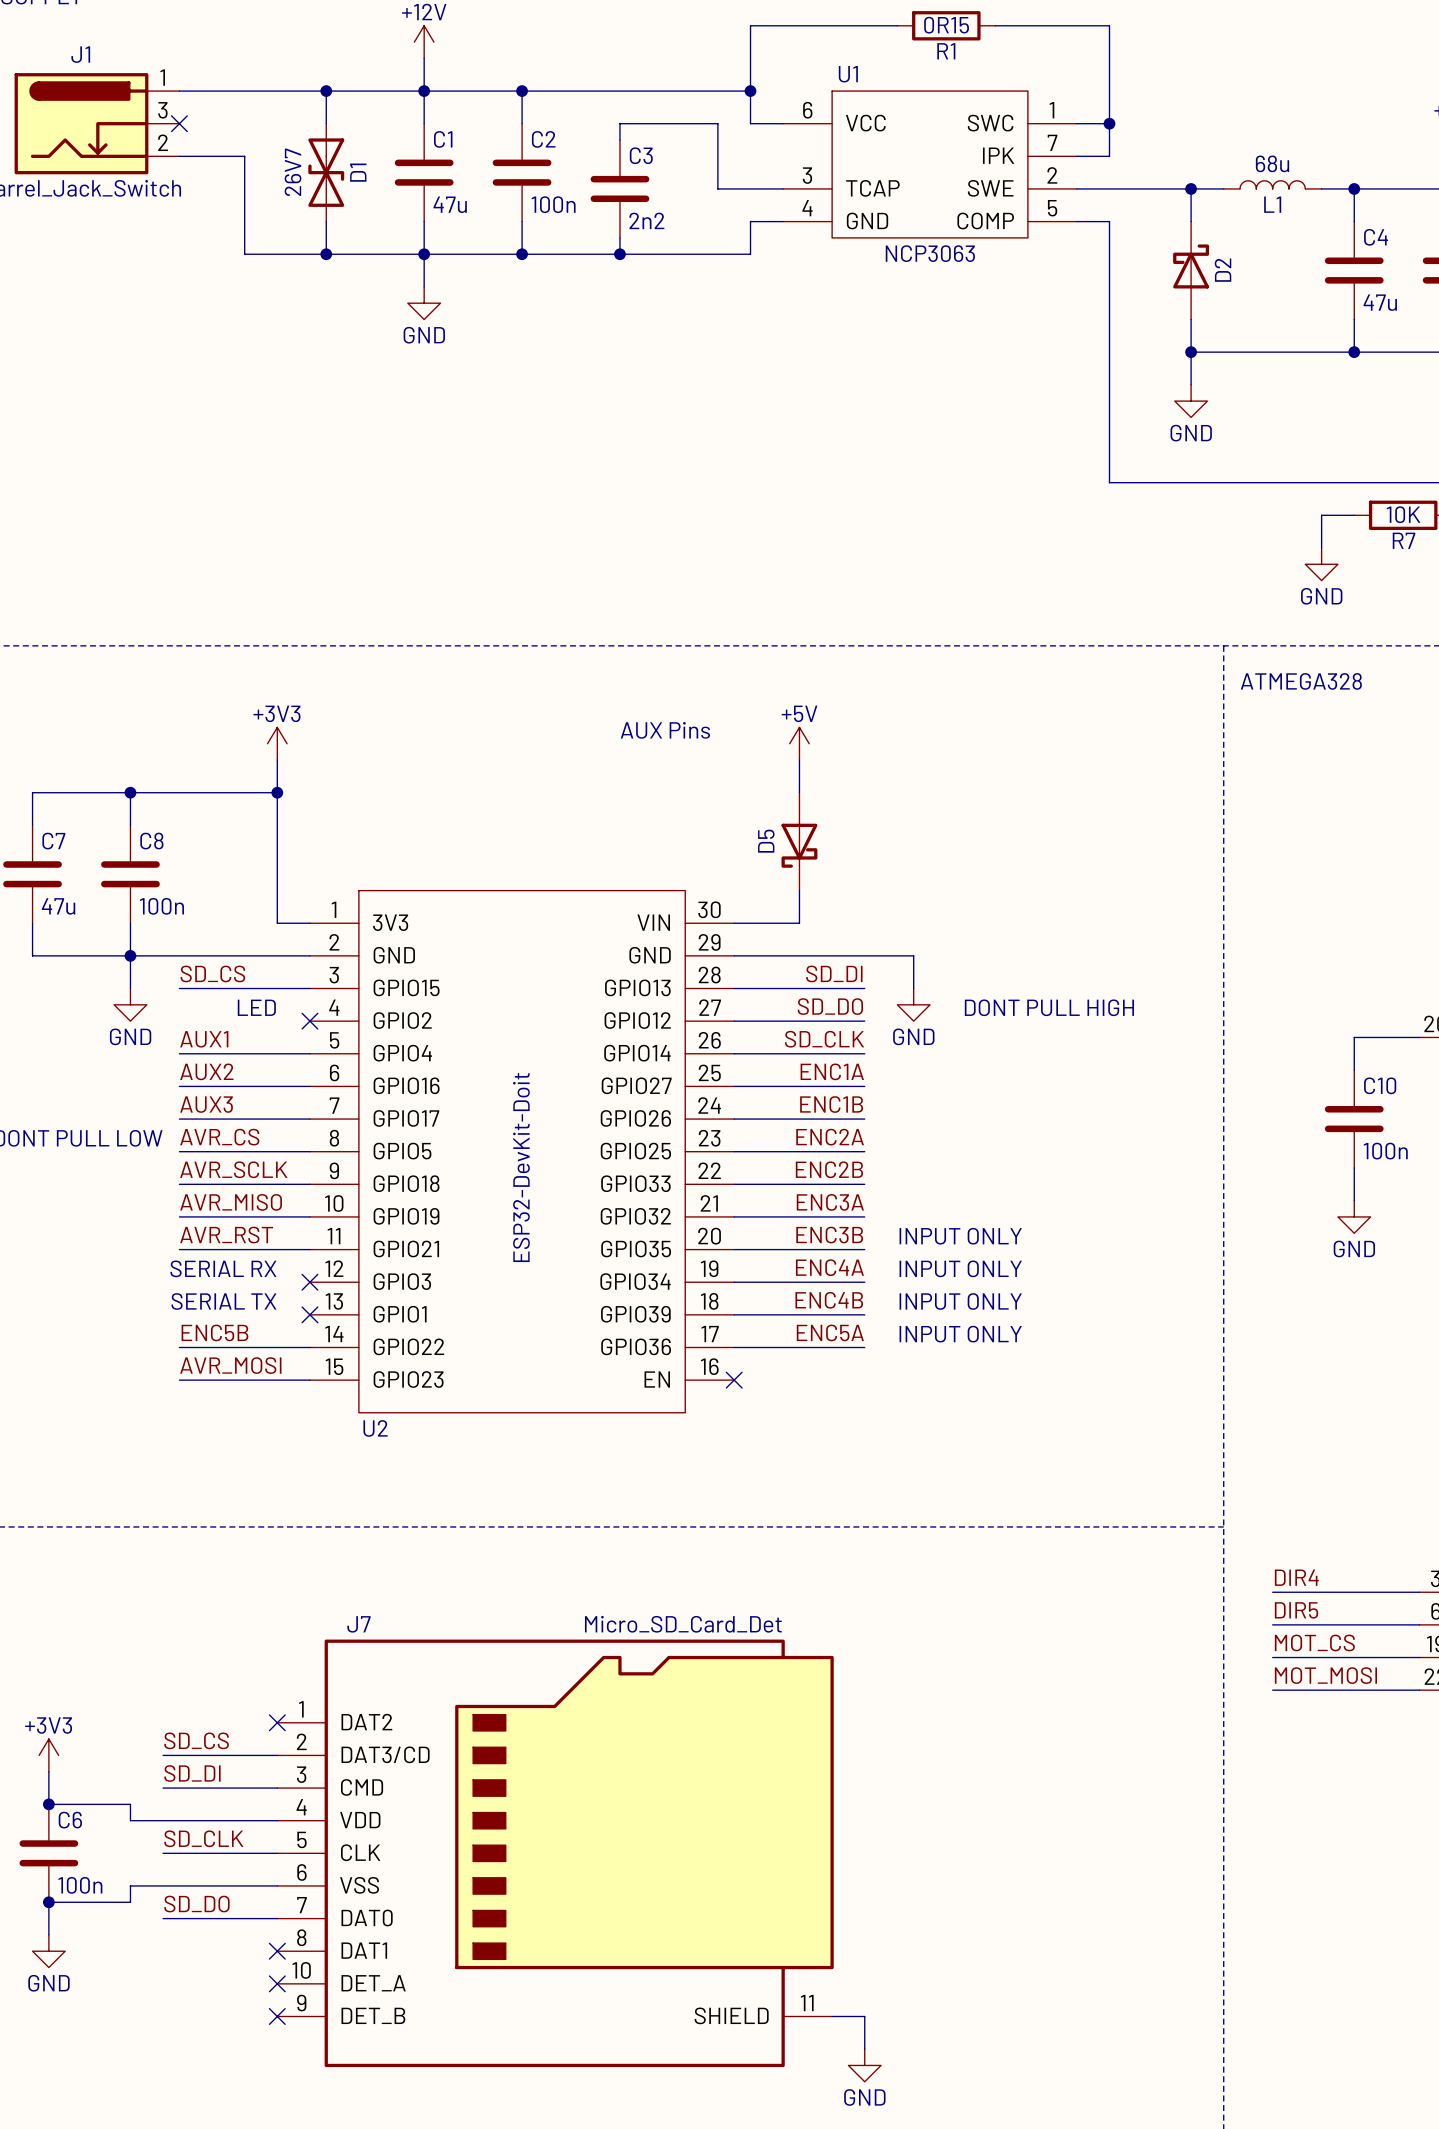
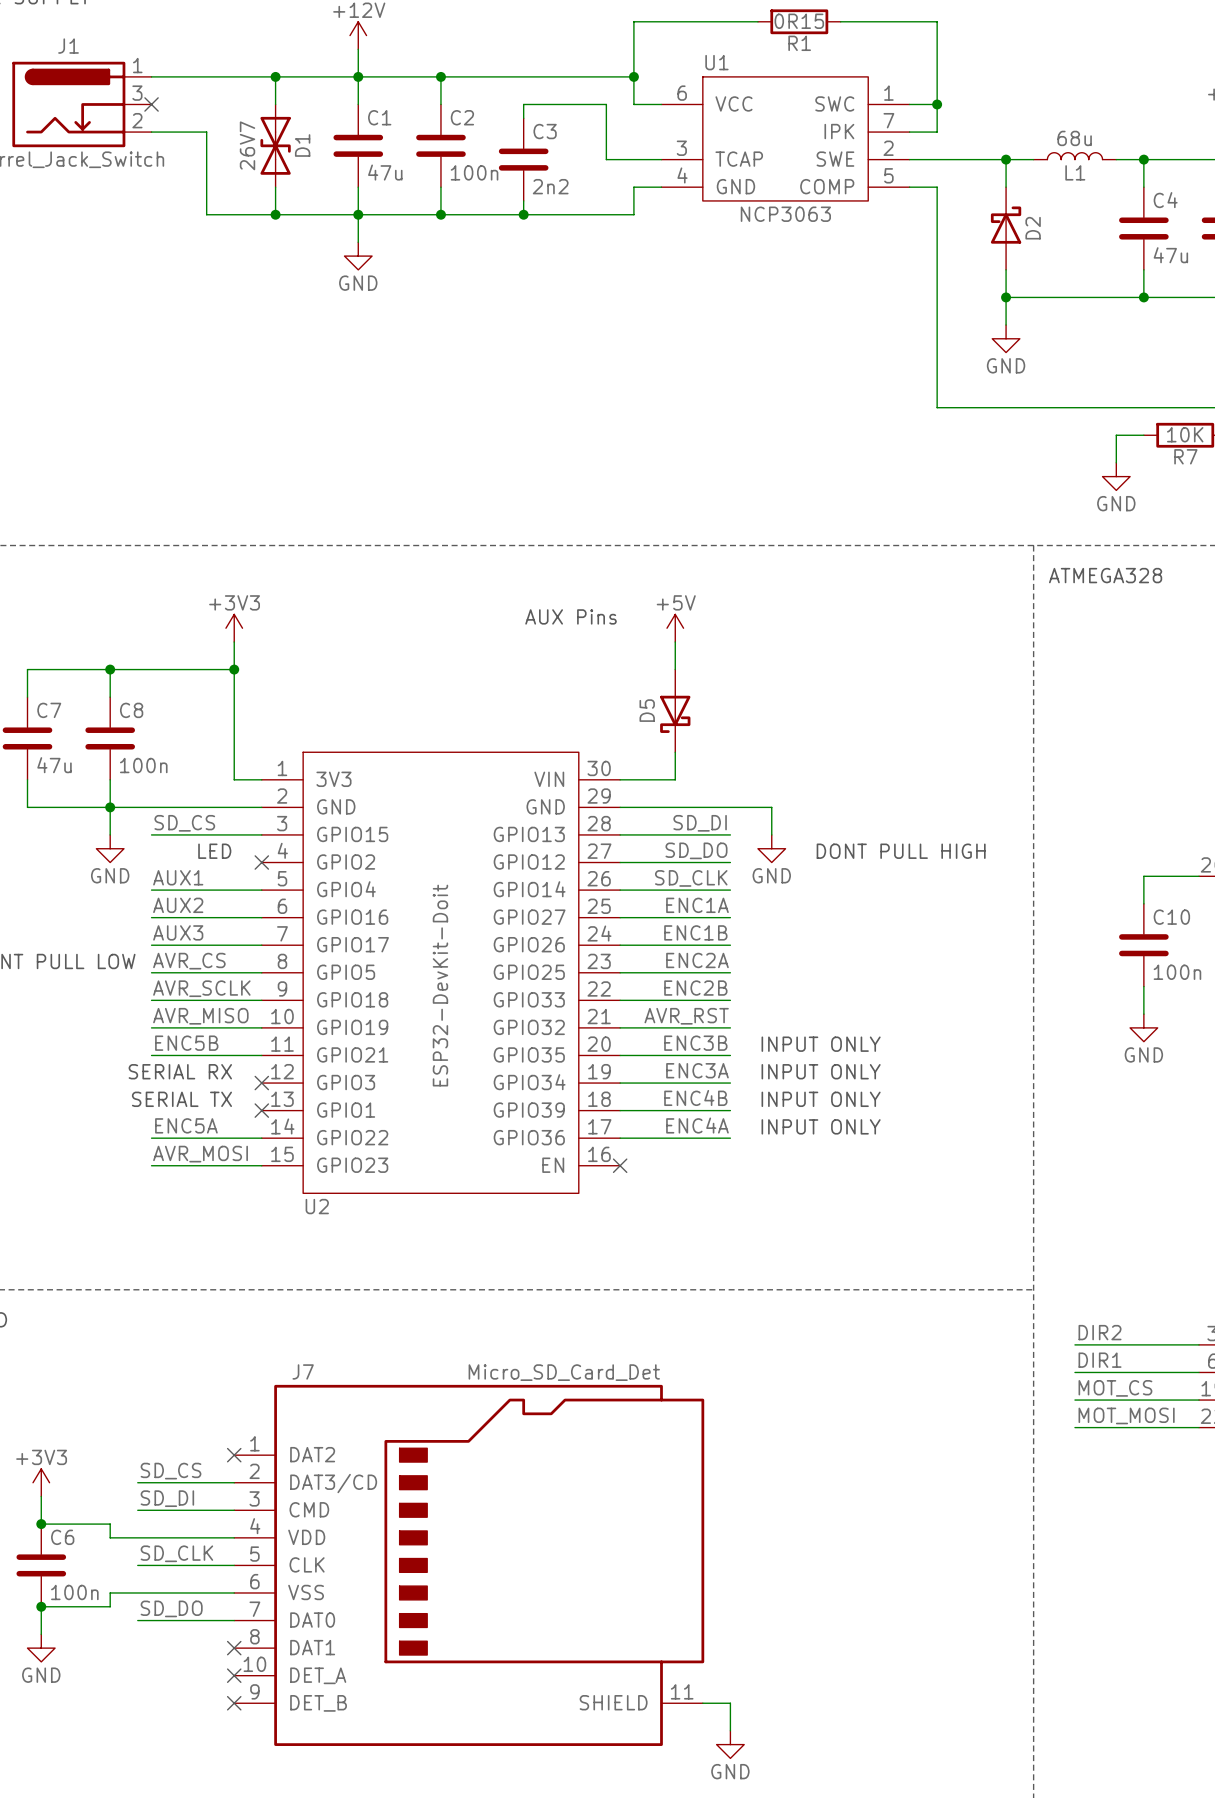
label: ENC3A (830, 1202) -> AVR_RST (686, 1016)
label: AVR_RST (226, 1235) -> ENC5B (186, 1043)
label: ENC4A (829, 1267) -> ENC3A (697, 1070)
label: ENC5B (214, 1332) -> ENC5A (186, 1125)
label: ENC5A (830, 1332) -> ENC4A (697, 1125)
label: DIR4 (1296, 1577) -> DIR2 (1100, 1332)
label: DIR5 (1296, 1610) -> DIR1 (1100, 1360)

